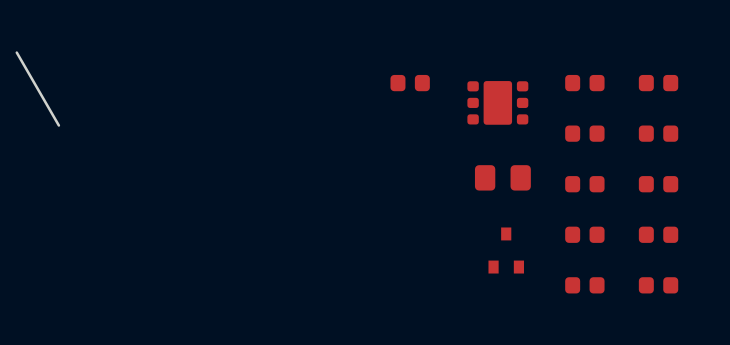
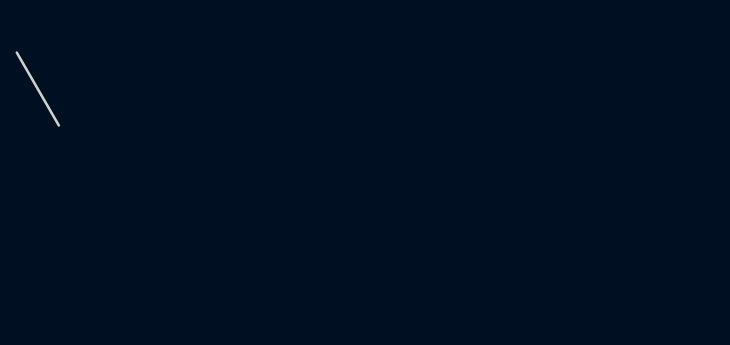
part: (410, 83) -> none
part: (584, 83) -> none
part: (658, 83) -> none
part: (497, 102) -> none
part: (584, 133) -> none
part: (658, 133) -> none
part: (502, 177) -> none
part: (584, 184) -> none
part: (658, 184) -> none
part: (584, 234) -> none
part: (658, 234) -> none
part: (506, 250) -> none
part: (584, 285) -> none
part: (658, 285) -> none

